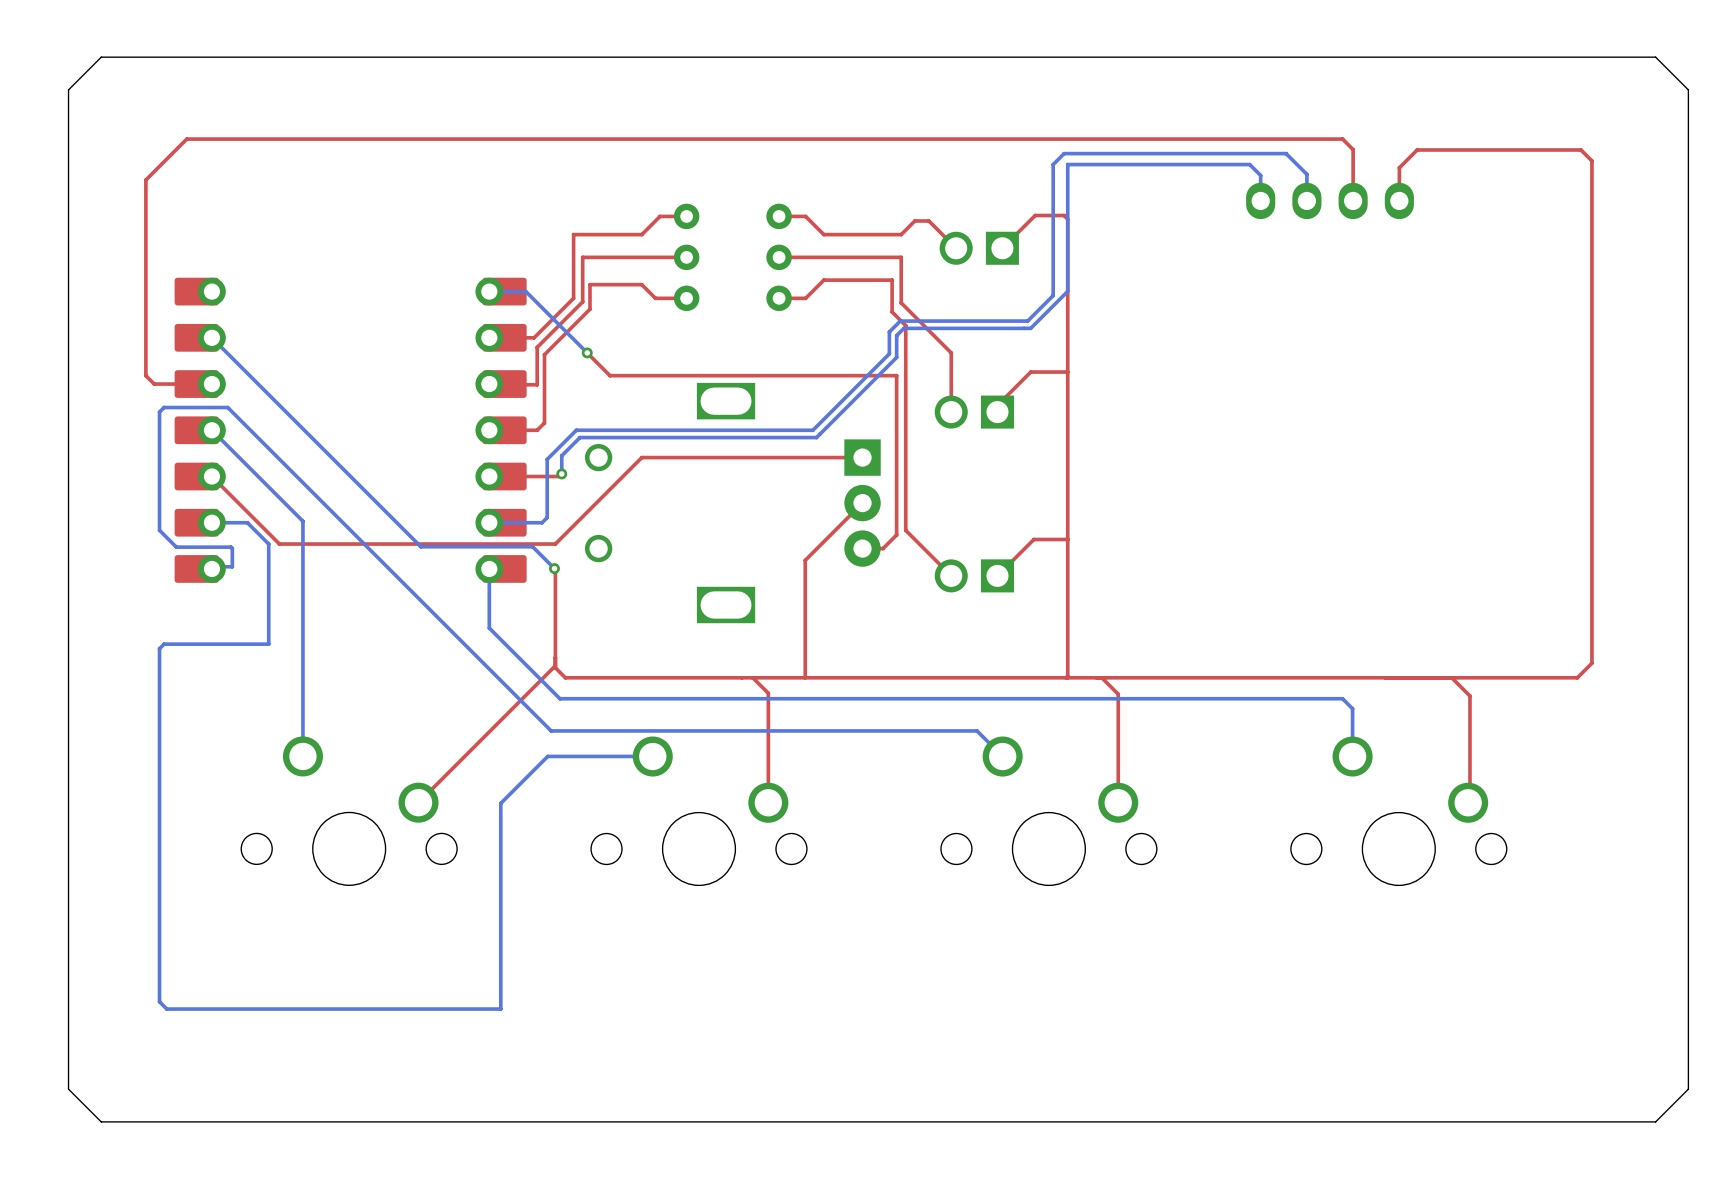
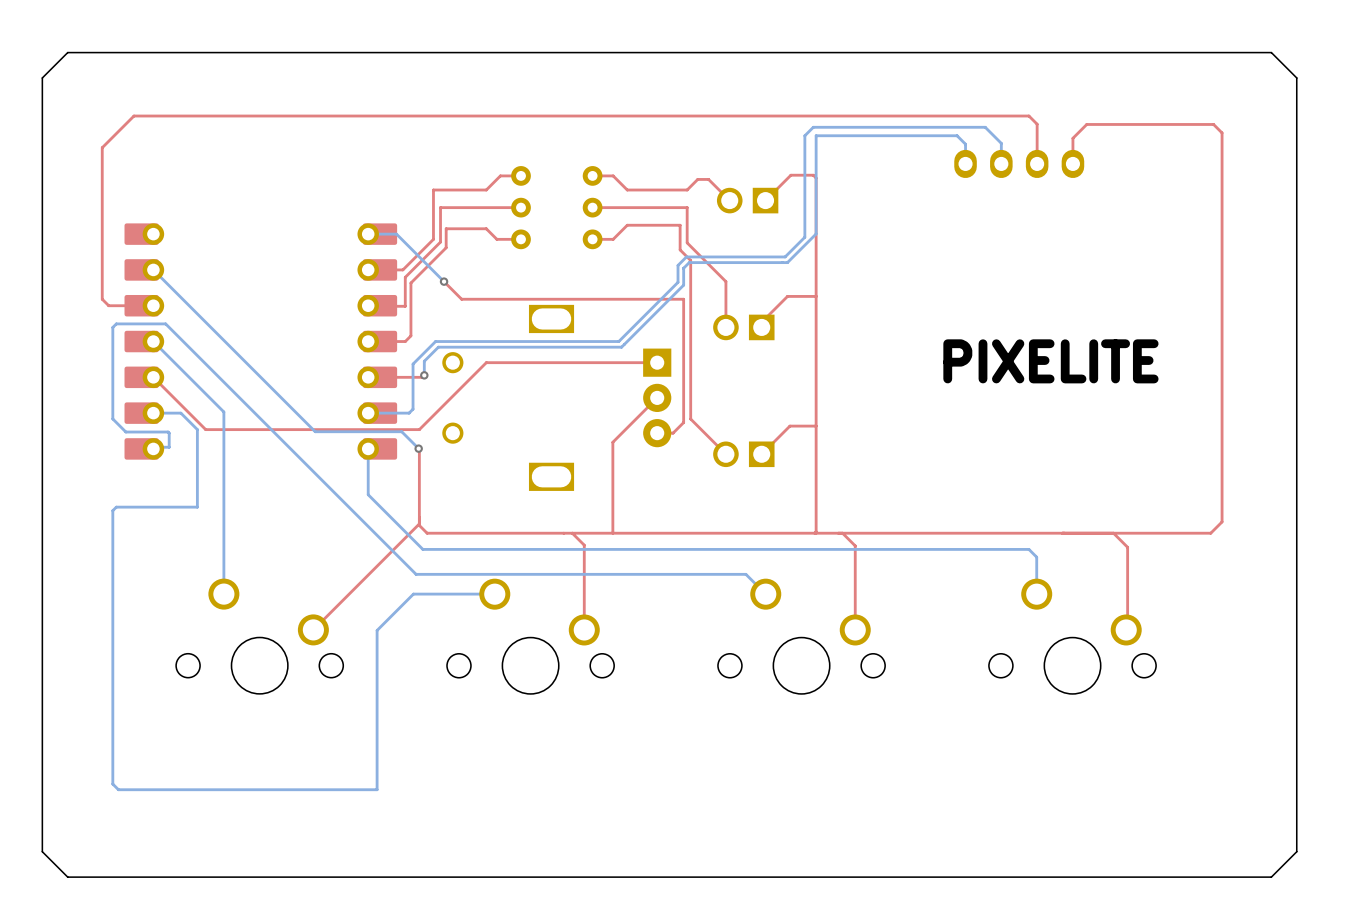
text: none -> PIXELITE (1050, 361)

